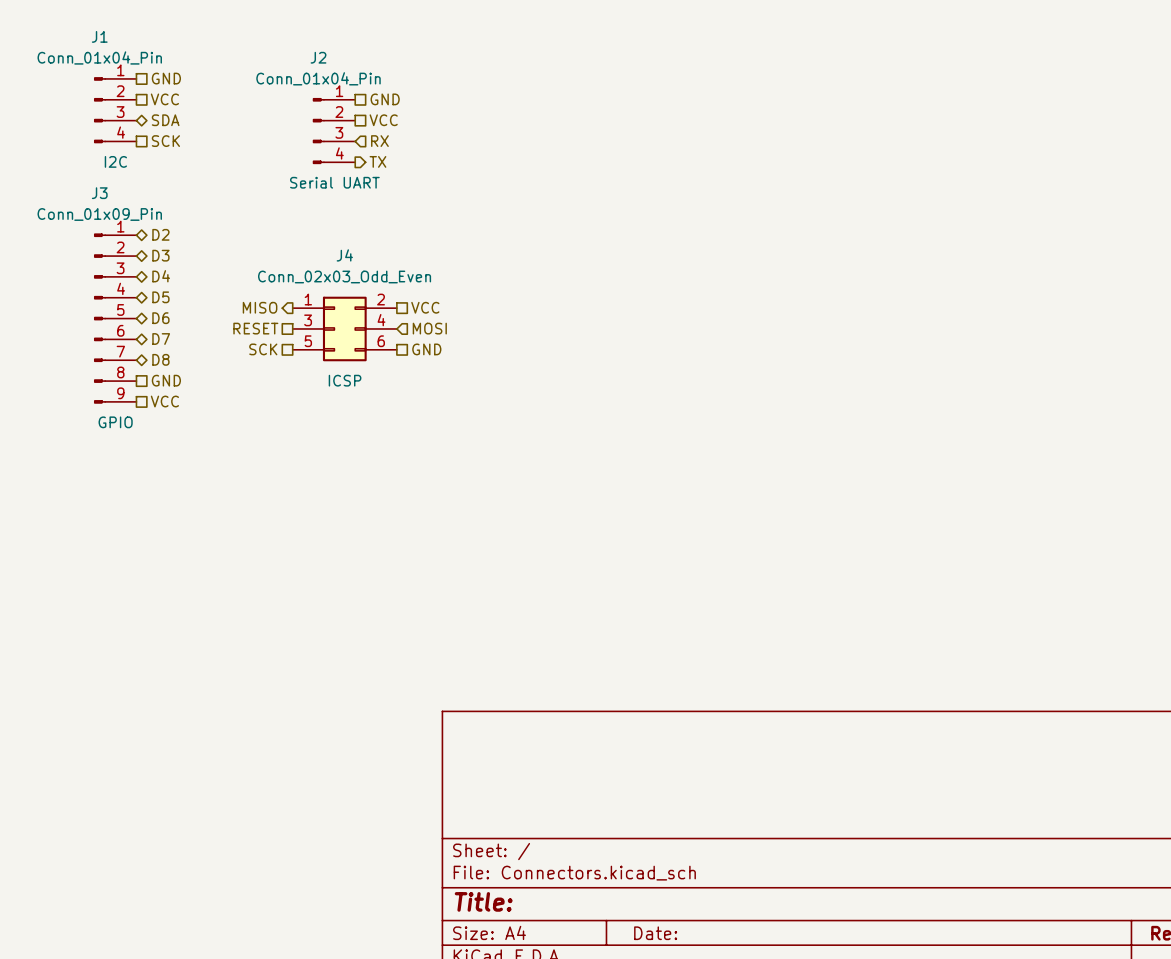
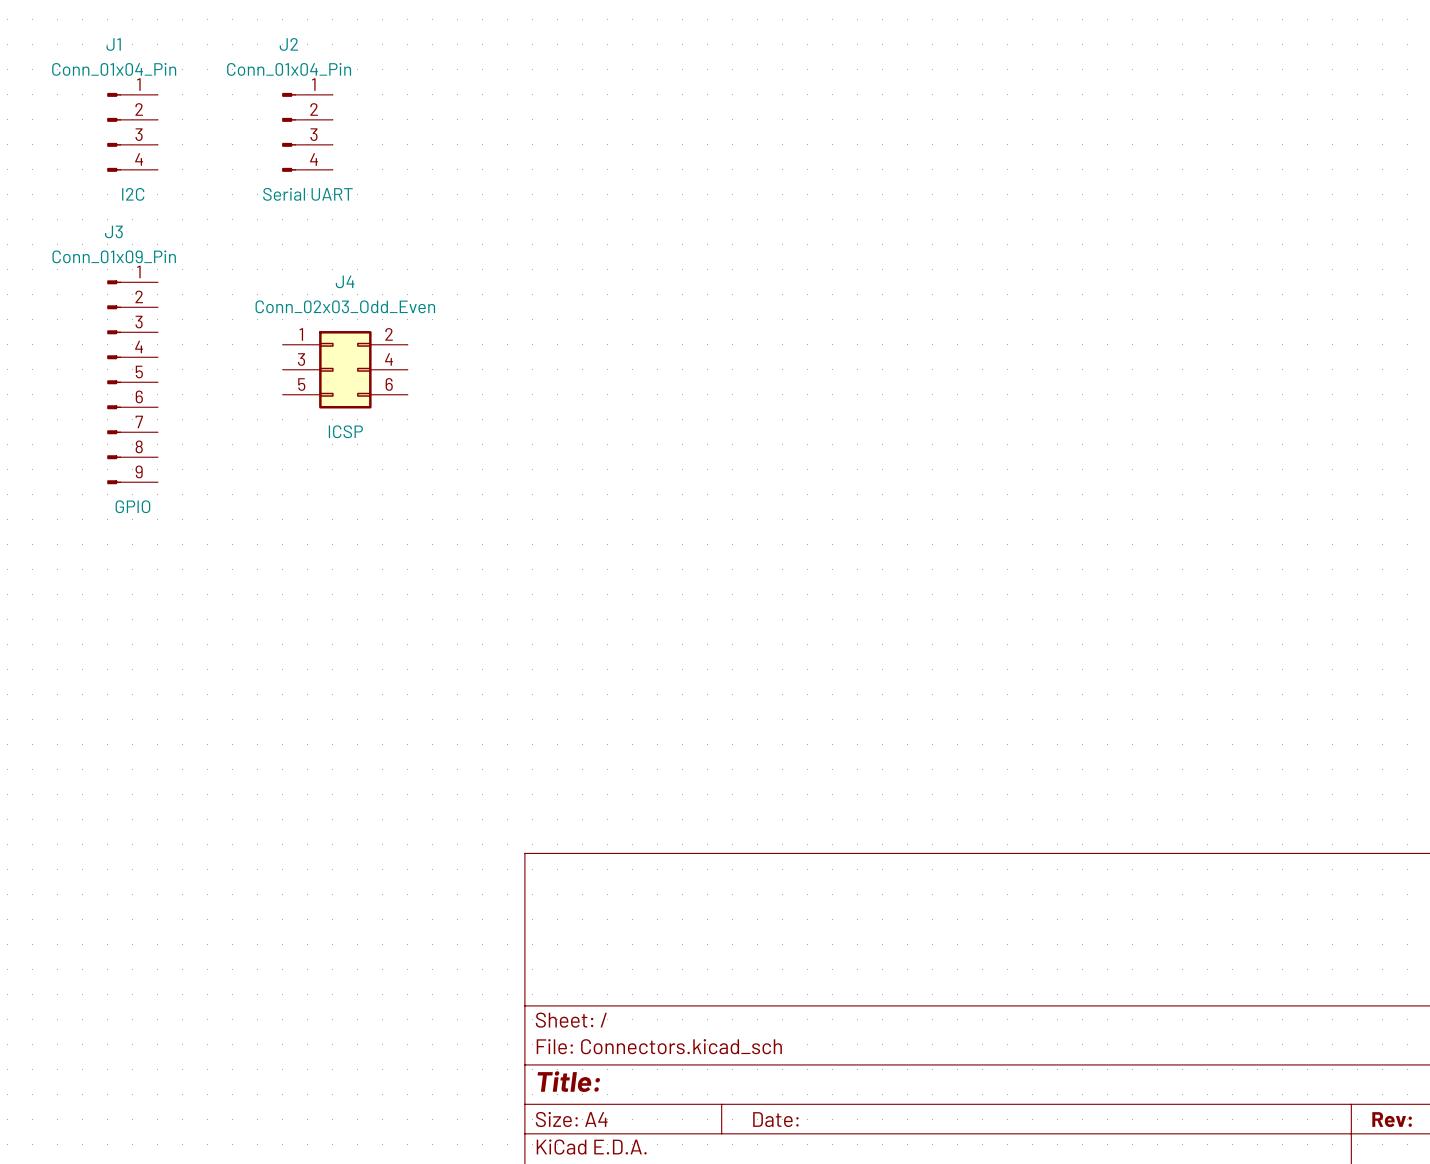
hierarchical label: GND (166, 78) -> none
hierarchical label: VCC (164, 99) -> none
hierarchical label: GND (385, 99) -> none
hierarchical label: SDA (165, 120) -> none
hierarchical label: VCC (383, 120) -> none
J2 position: (334, 131) -> (307, 132)
hierarchical label: SCK (165, 141) -> none
hierarchical label: RX (379, 141) -> none
hierarchical label: TX (377, 161) -> none
hierarchical label: D2 (160, 234) -> none
hierarchical label: D3 (160, 255) -> none
hierarchical label: D4 (161, 276) -> none
hierarchical label: D5 (160, 297) -> none
hierarchical label: MISO (260, 307) -> none
hierarchical label: VCC (425, 307) -> none
hierarchical label: D6 (160, 318) -> none
hierarchical label: RESET (255, 328) -> none
J4 position: (344, 328) -> (345, 369)
hierarchical label: MOSI (429, 328) -> none
hierarchical label: D7 (161, 339) -> none
hierarchical label: SCK (263, 349) -> none
hierarchical label: GND (426, 349) -> none
hierarchical label: D8 (160, 359) -> none
hierarchical label: GND (166, 380) -> none
hierarchical label: VCC (164, 401) -> none

